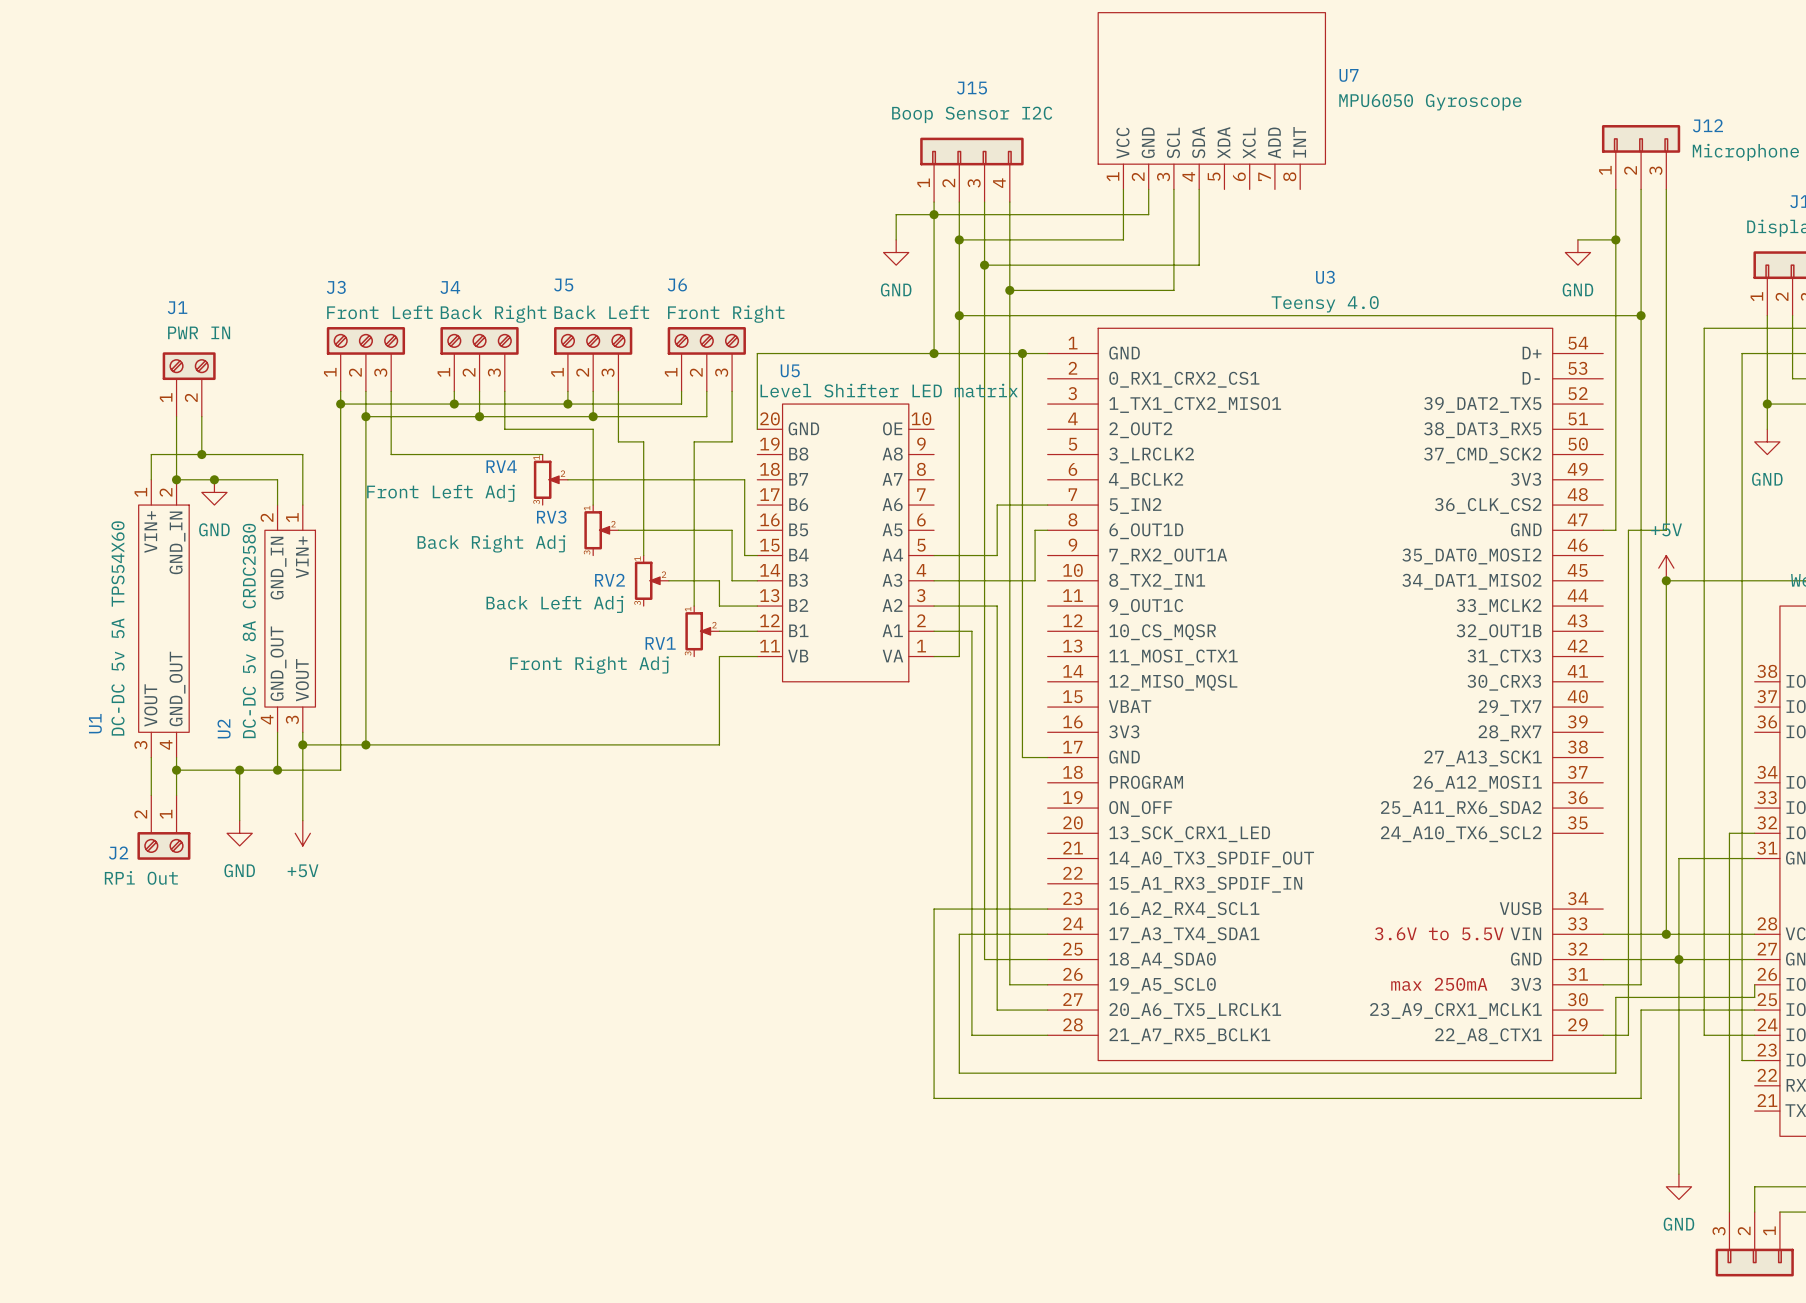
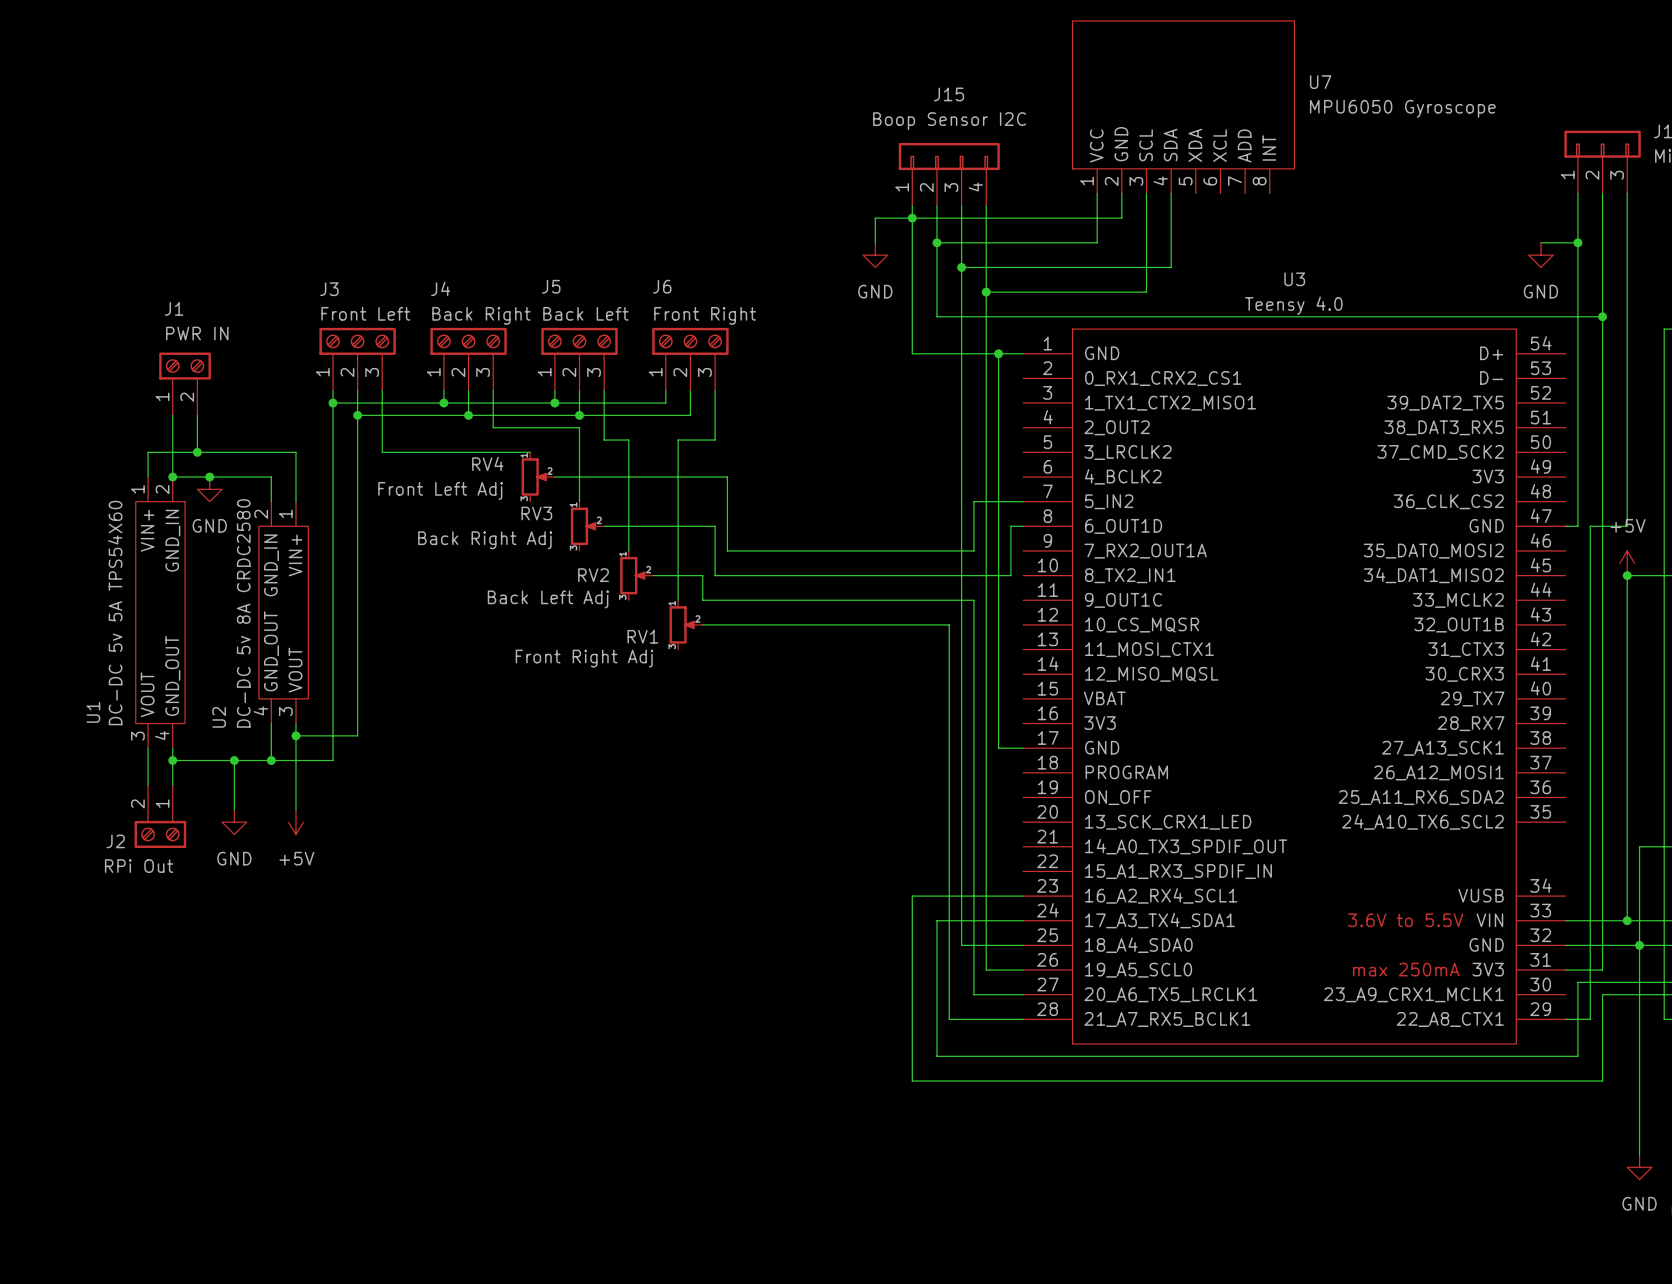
wire: (959, 315) (959, 656) (934, 656) -> none
junction: (959, 315) -> none
wire: (934, 353) (757, 353) (757, 429) -> none
junction: (934, 353) -> none
U5: Level Shifter LED matrix (845, 542) -> none
wire: none -> (739, 550) (912, 550)
wire: none -> (739, 575) (912, 575)
wire: none -> (739, 600) (912, 600)
wire: none -> (739, 624) (912, 624)
wire: (757, 656) (719, 656) (719, 744) (365, 744) -> none
junction: (365, 744) -> none

